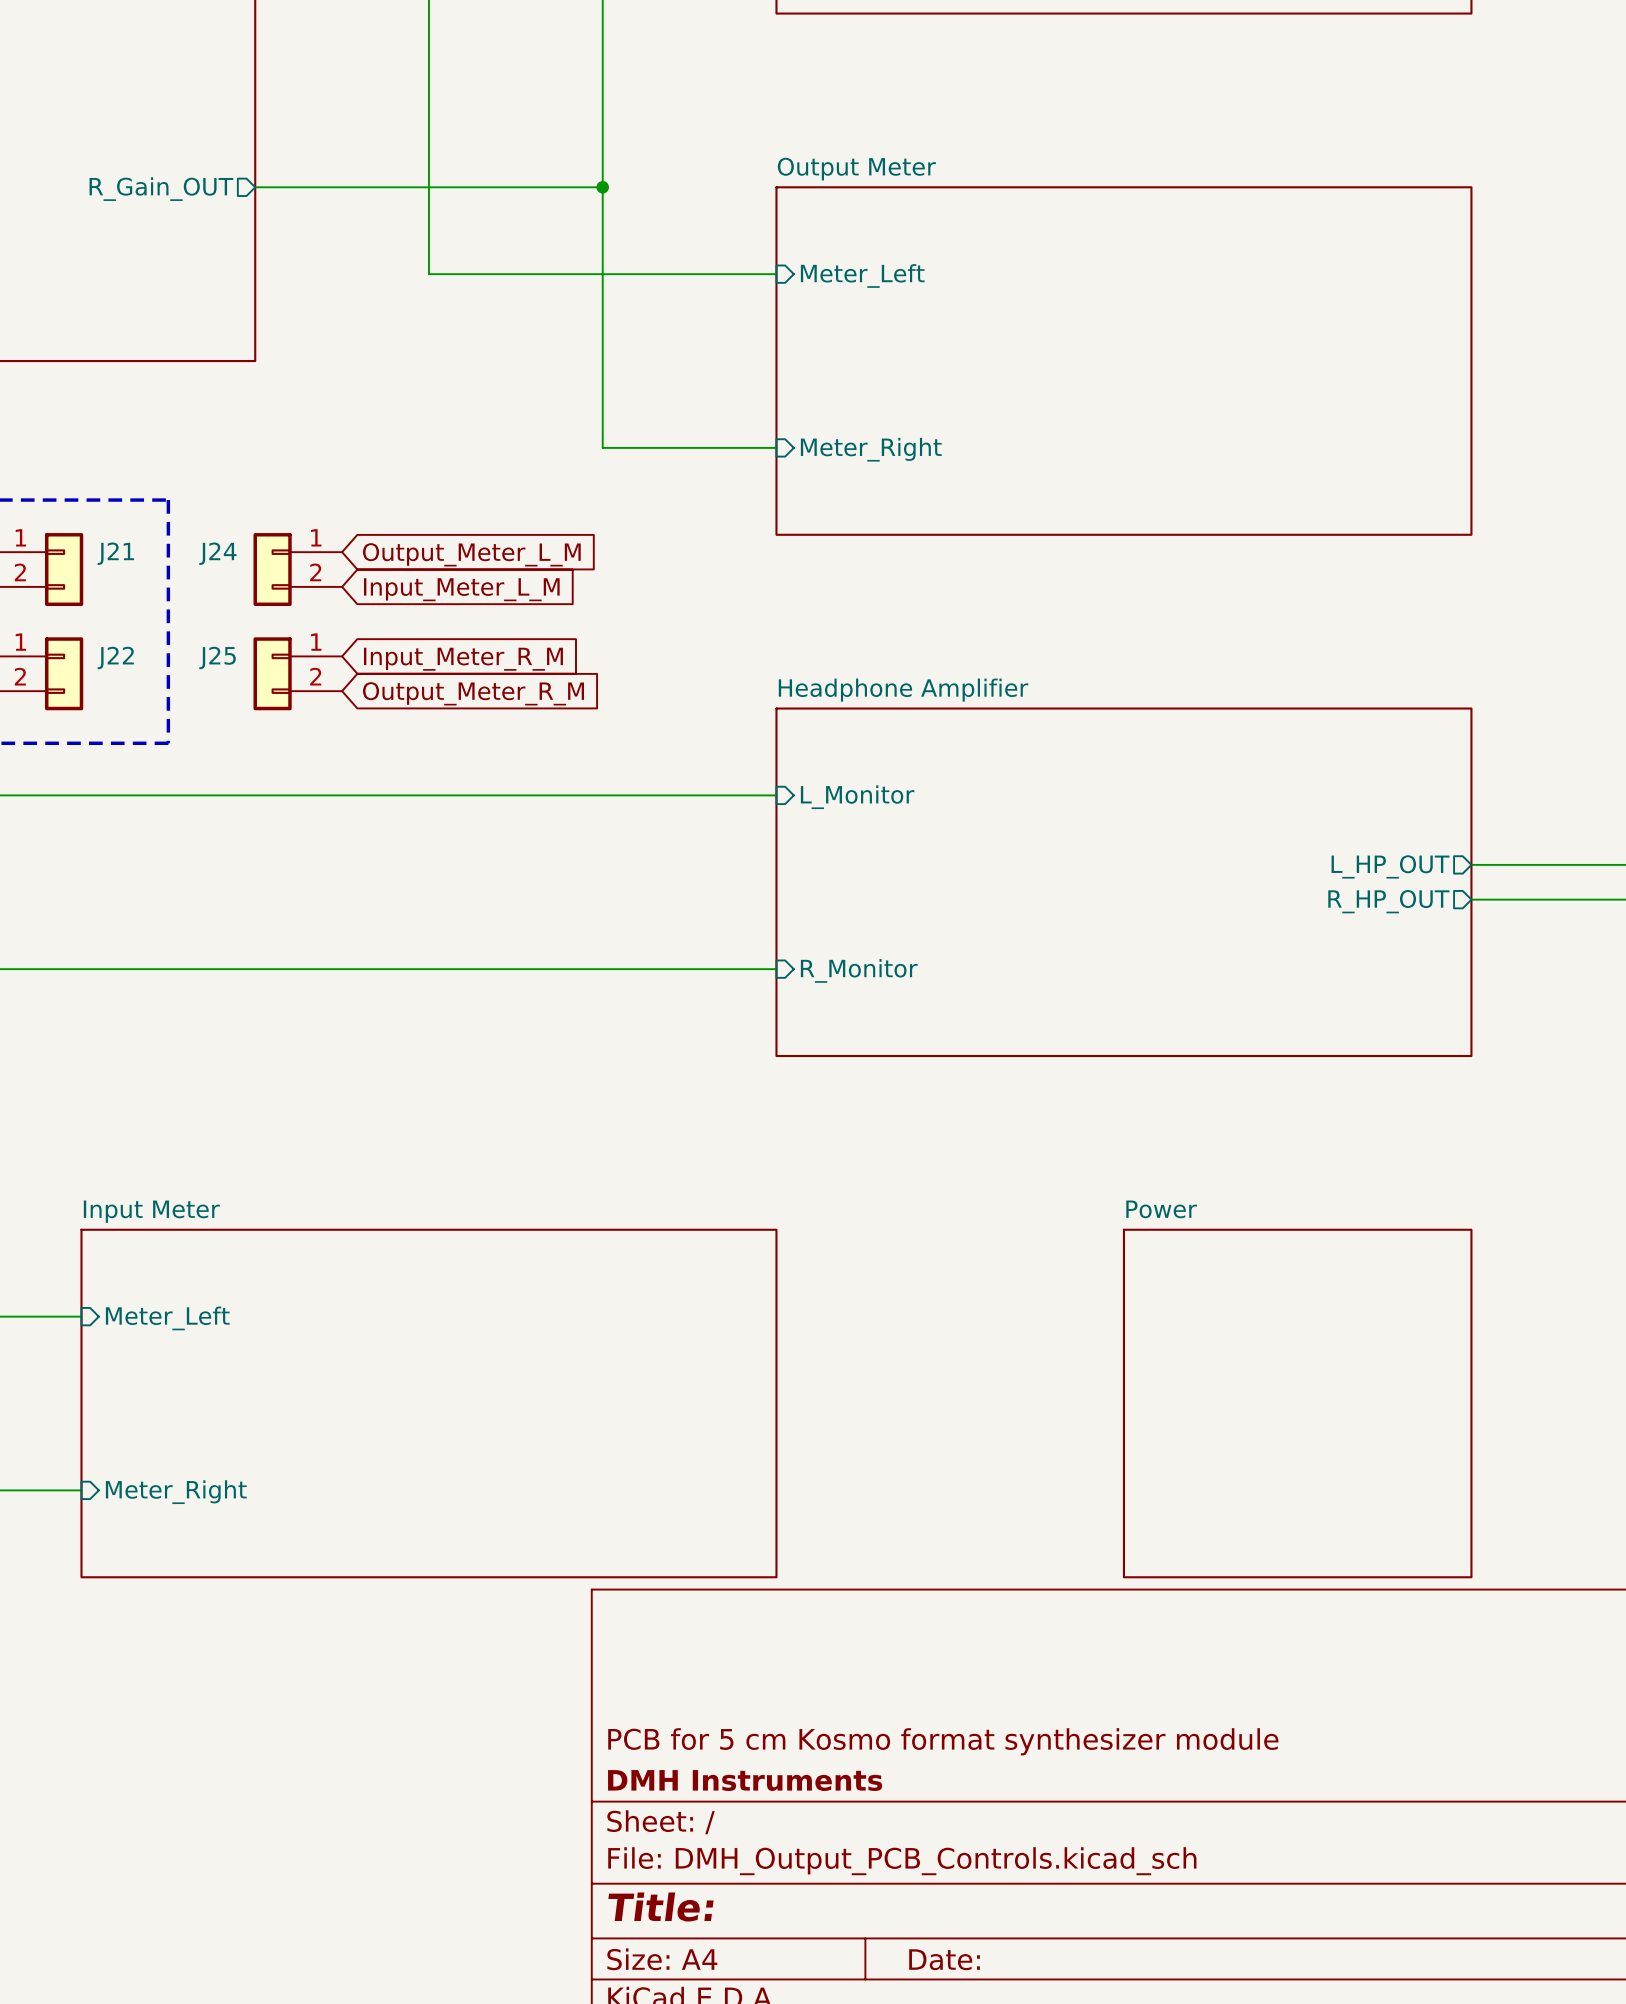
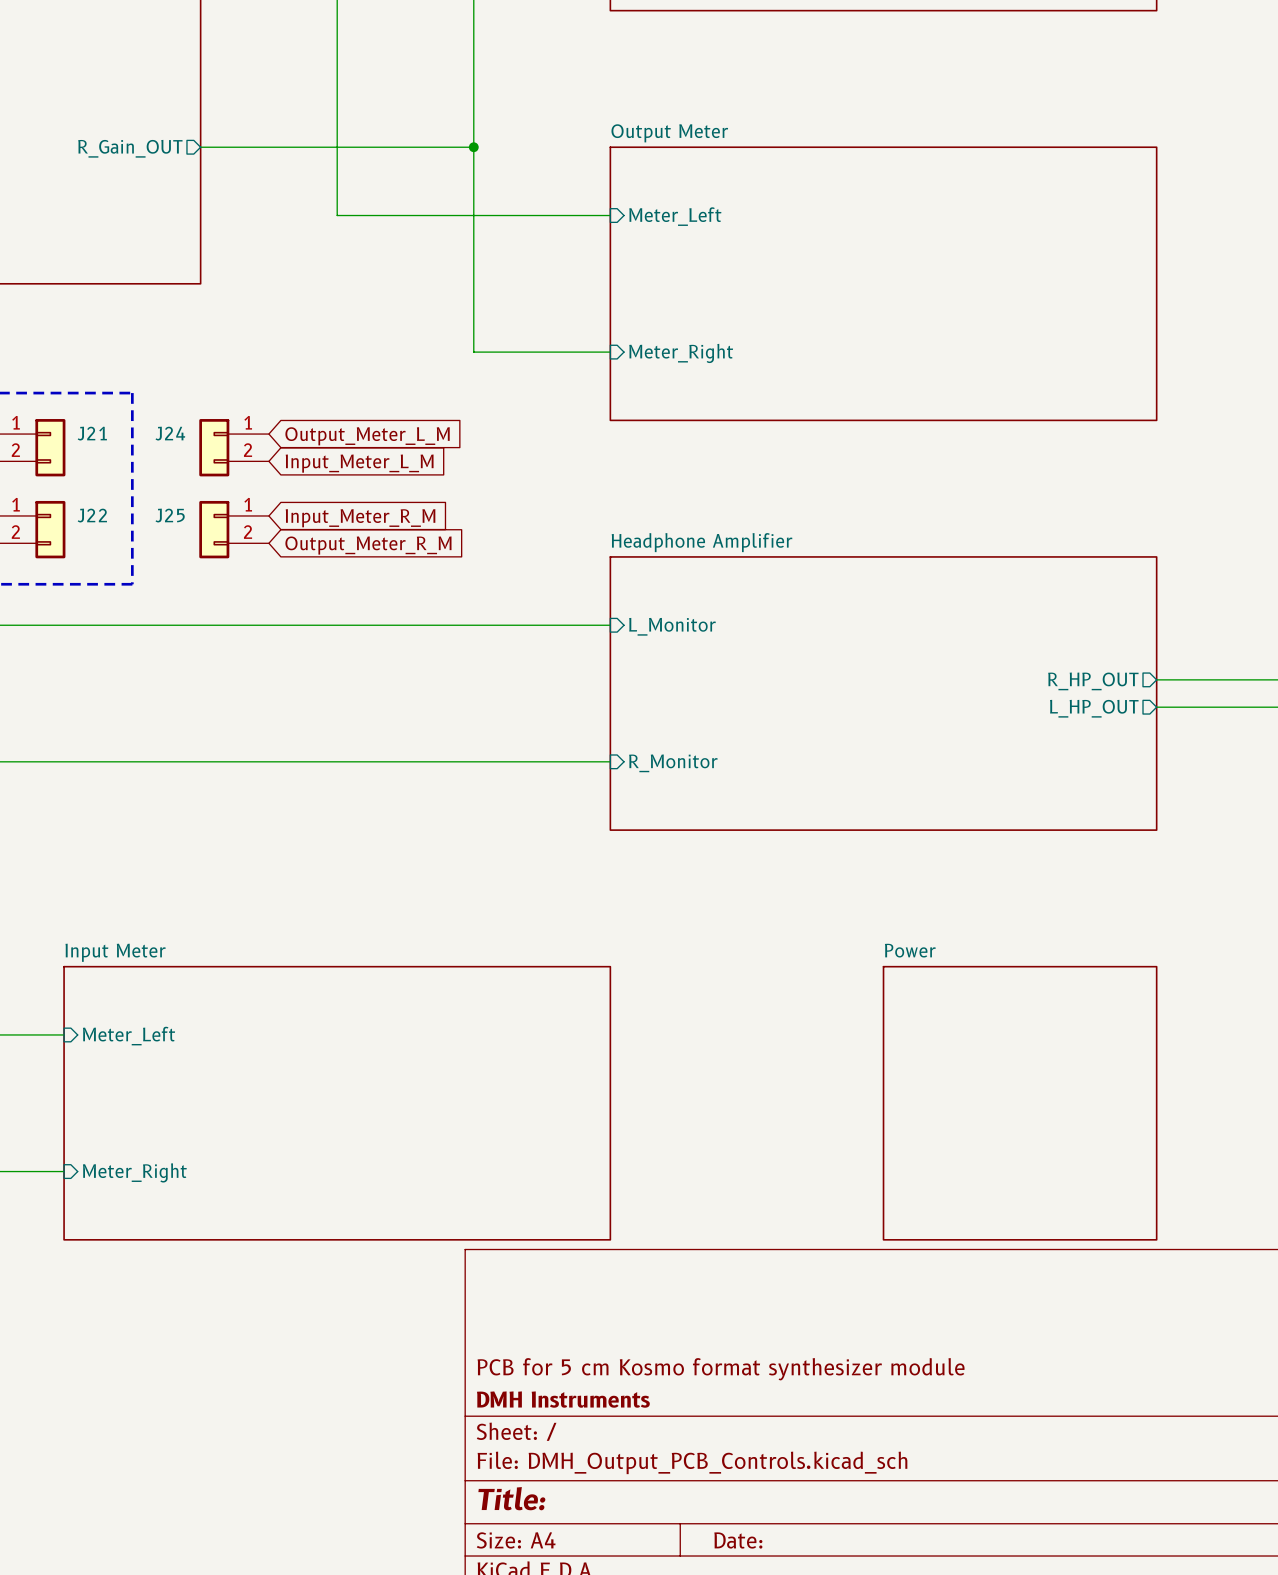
sheet pin: L_HP_OUT (1390, 866) -> R_HP_OUT (1093, 681)
sheet pin: R_HP_OUT (1388, 901) -> L_HP_OUT (1094, 708)

